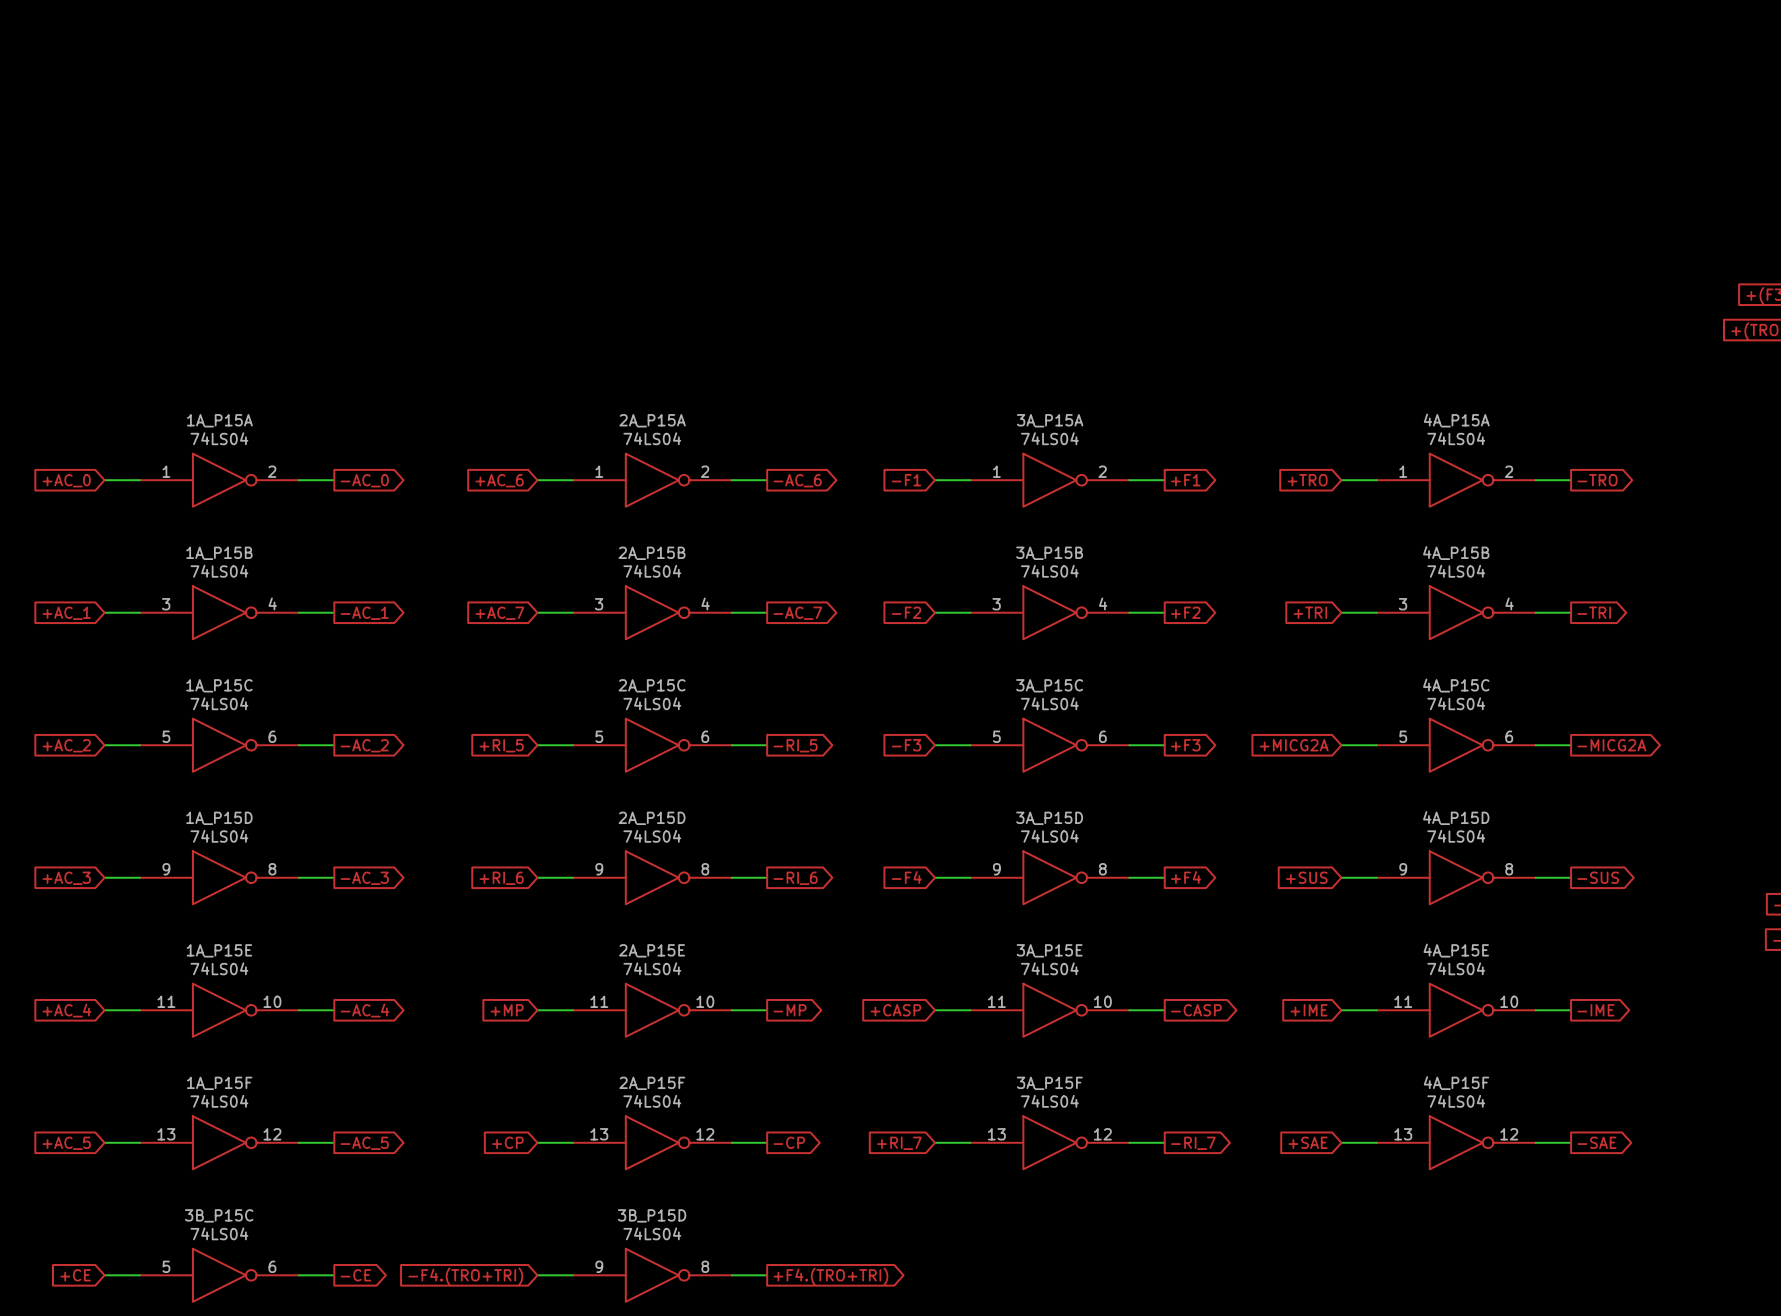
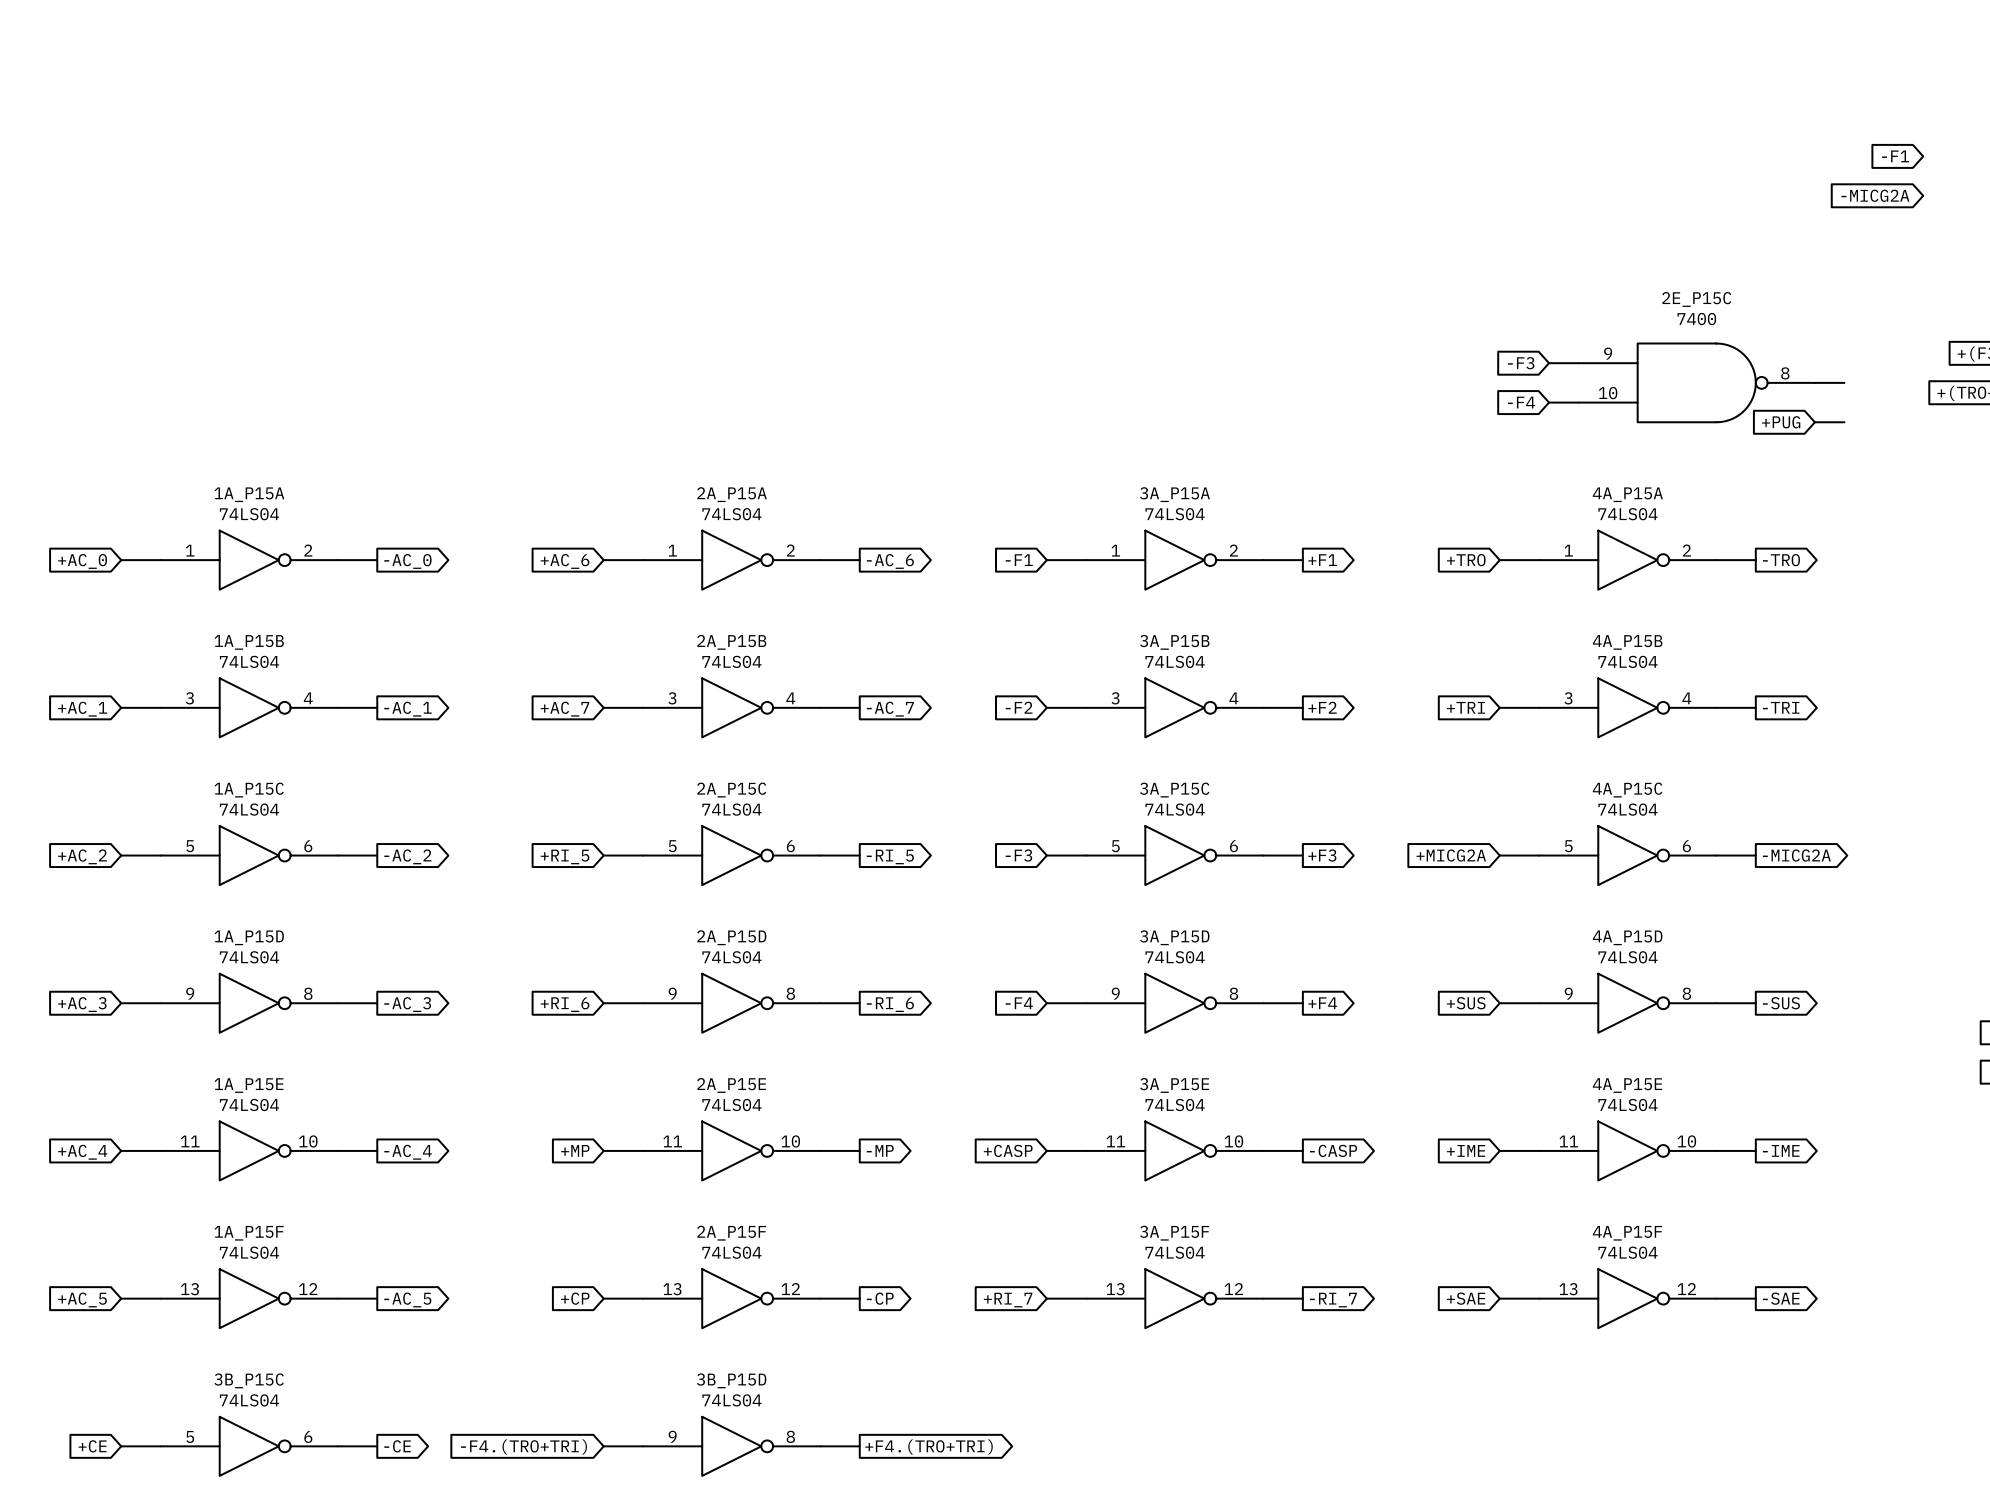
global label: none -> -F1 (1895, 156)
global label: none -> -MICG2A (1875, 195)
global label: none -> -F3 (1521, 363)
wire: none -> (1549, 363) (1578, 363)
2E_P15C: none -> 7400 (1696, 382)
wire: none -> (1814, 382) (1844, 382)
global label: none -> -F4 (1521, 402)
wire: none -> (1549, 402) (1578, 402)
global label: none -> +PUG (1781, 422)
wire: none -> (1814, 422) (1844, 422)

